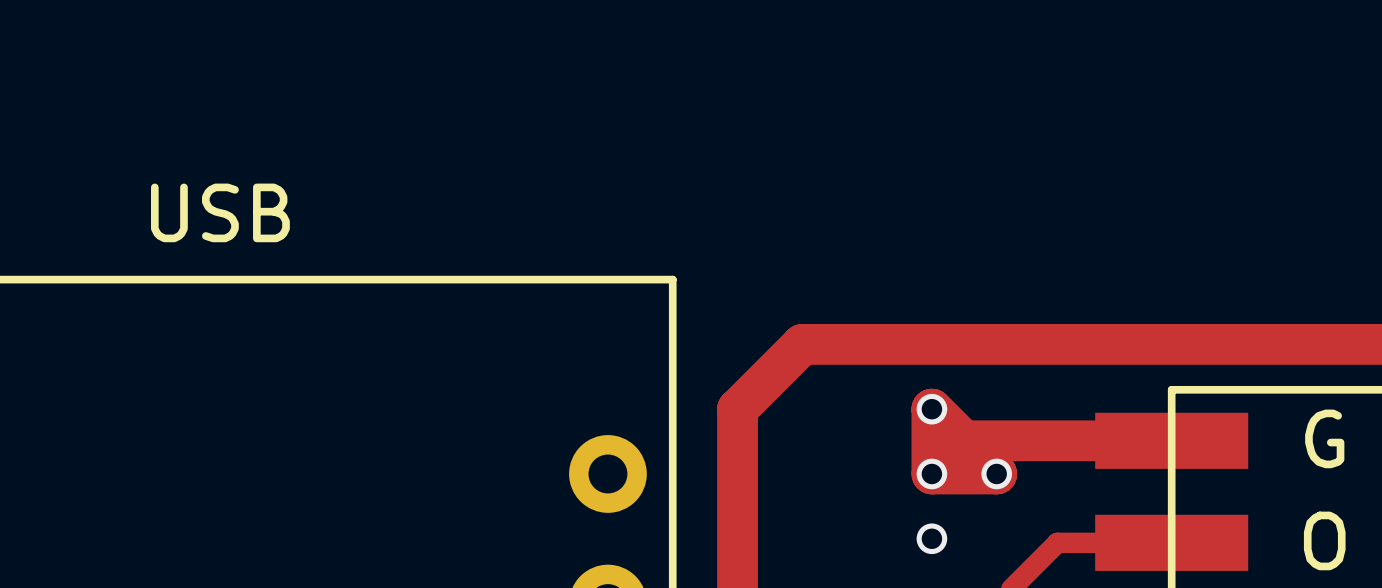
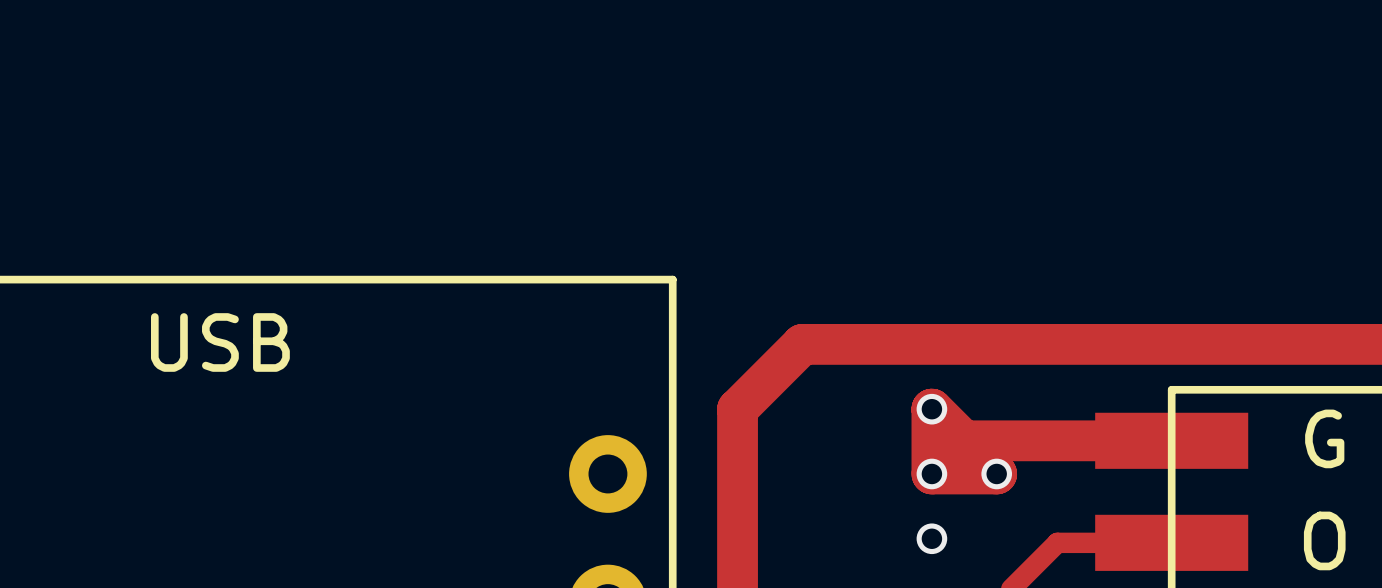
part text position: USB (220, 212) -> USB (220, 342)

